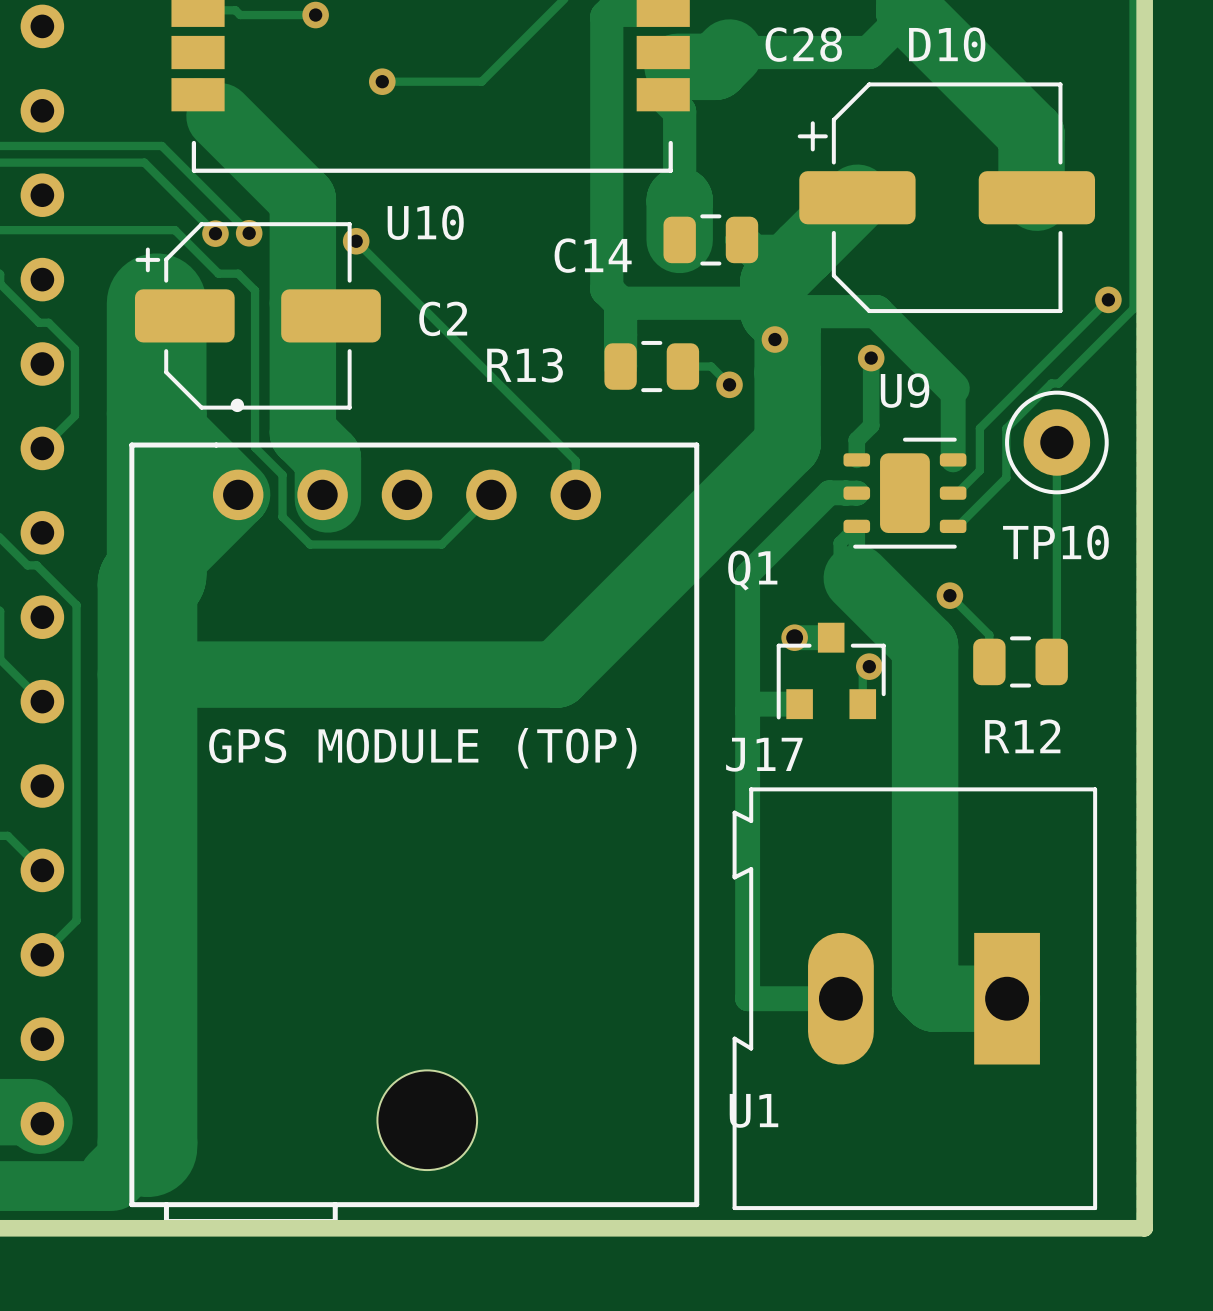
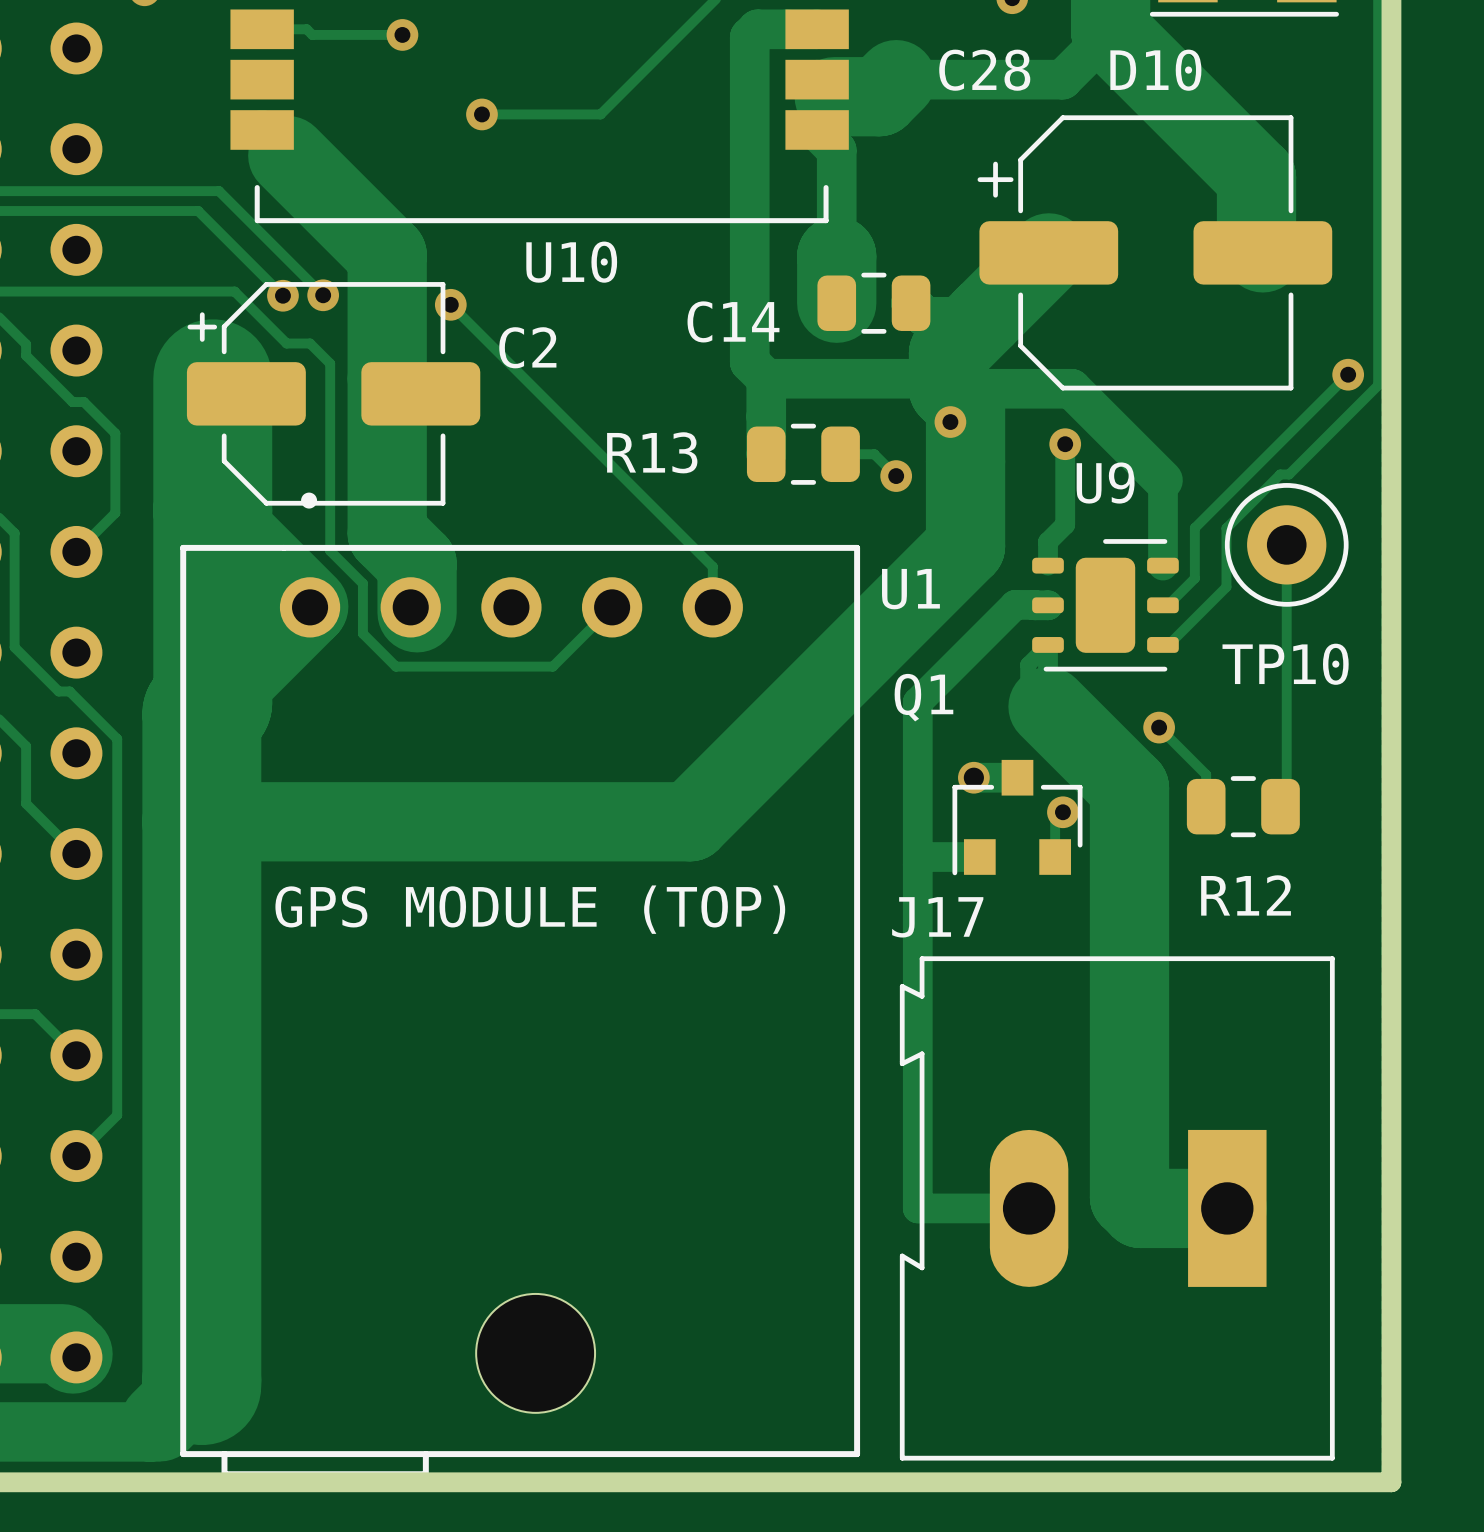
U10 name position: U10 (425, 222) -> U10 (571, 262)
C2 name position: C2 (443, 318) -> C2 (527, 347)
U1 name position: U1 (753, 1110) -> U1 (910, 589)

